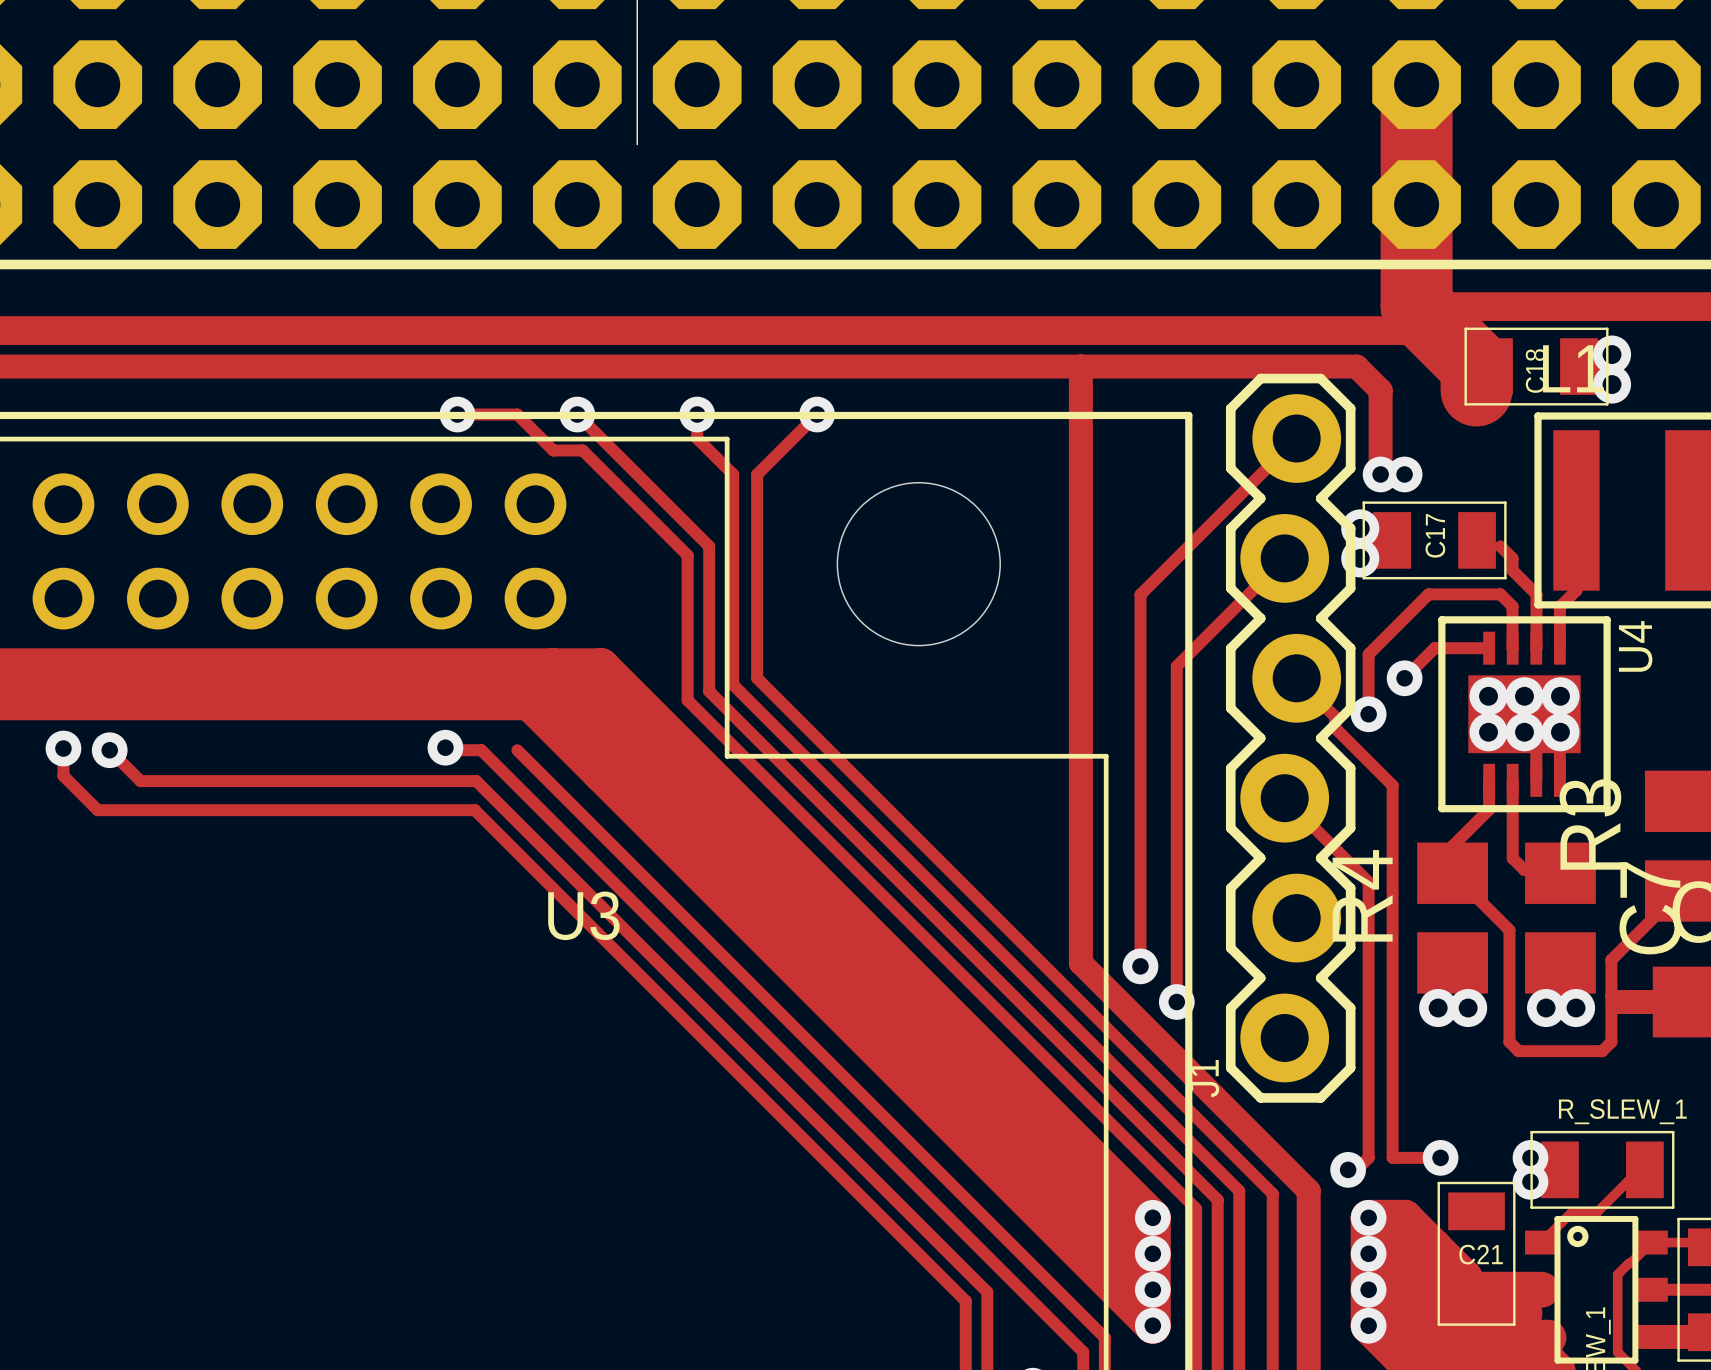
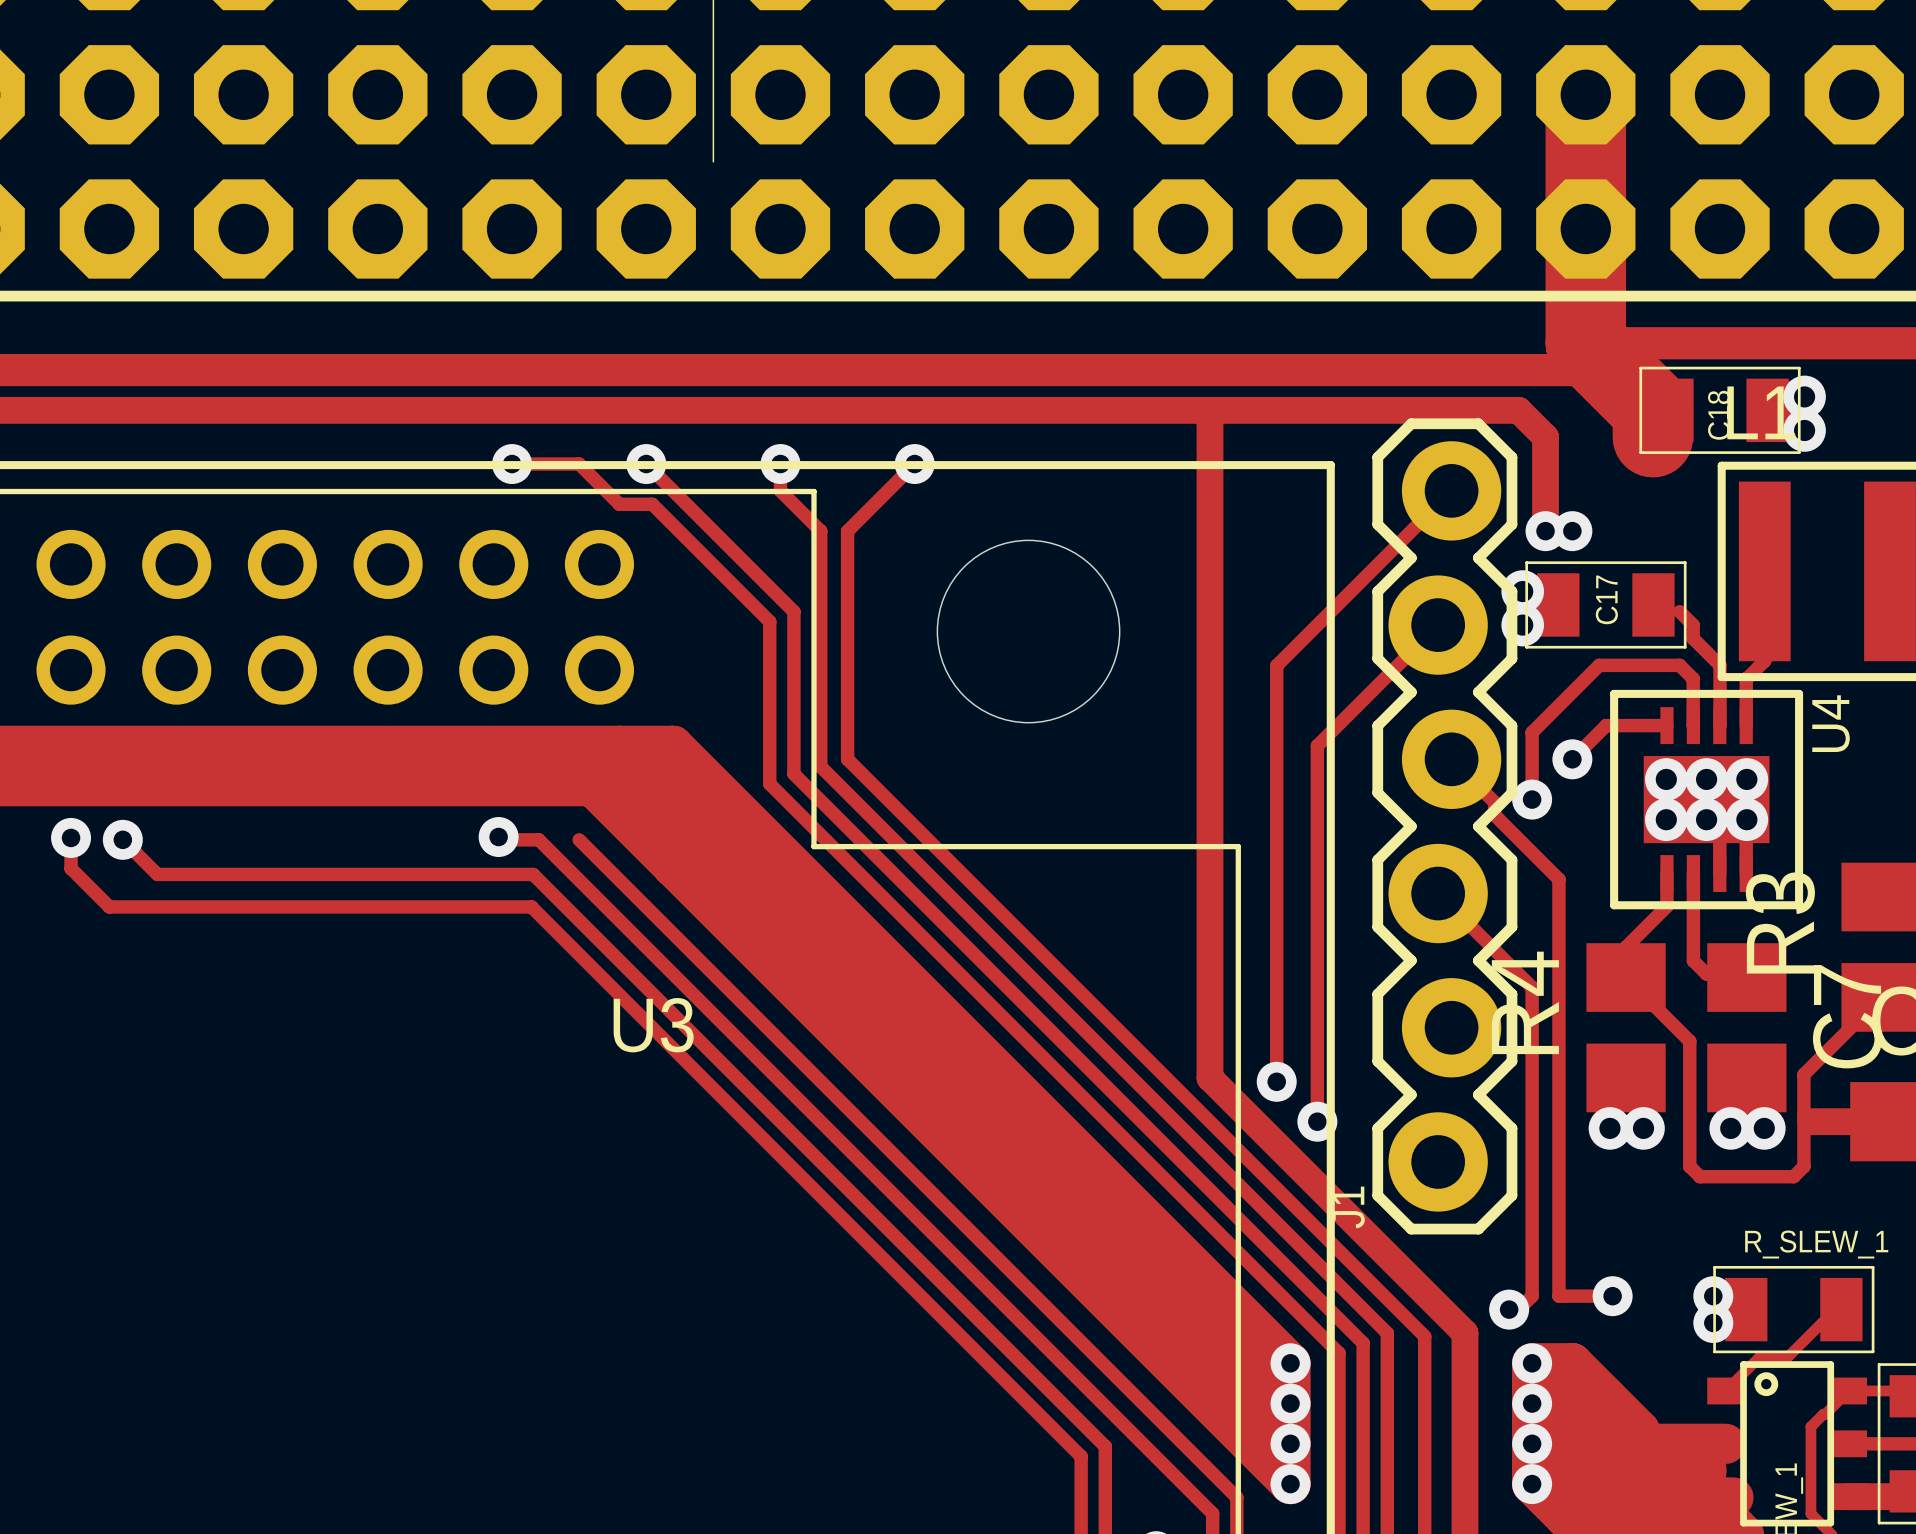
C21: (1476, 1253) -> none

